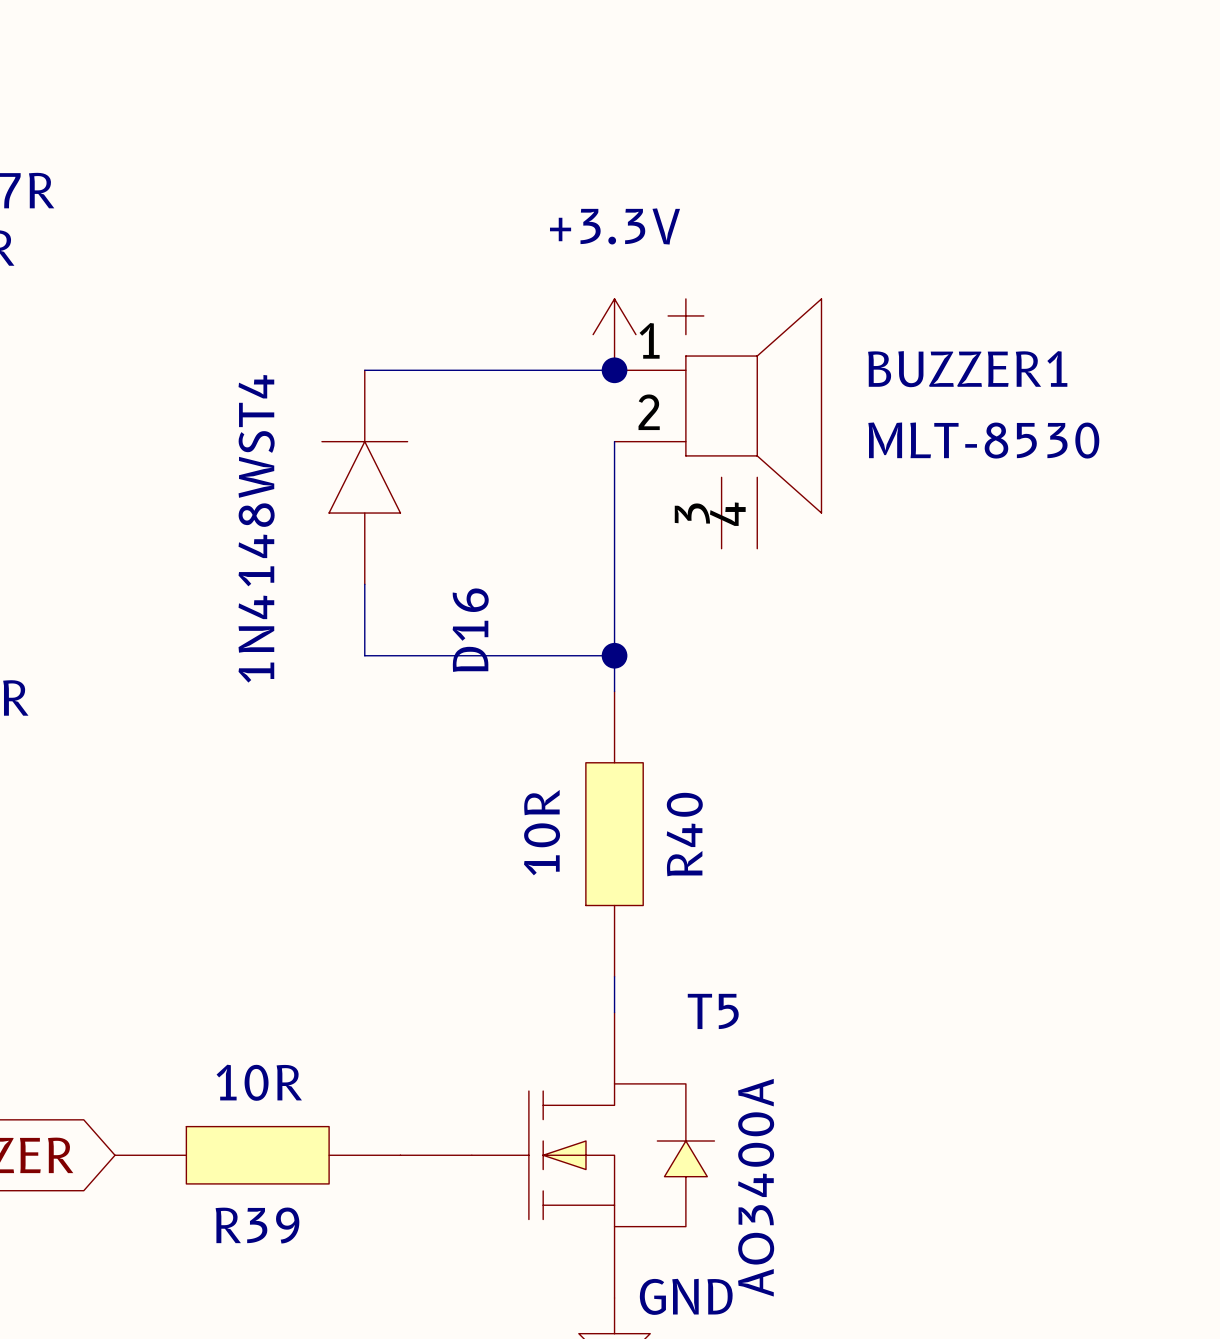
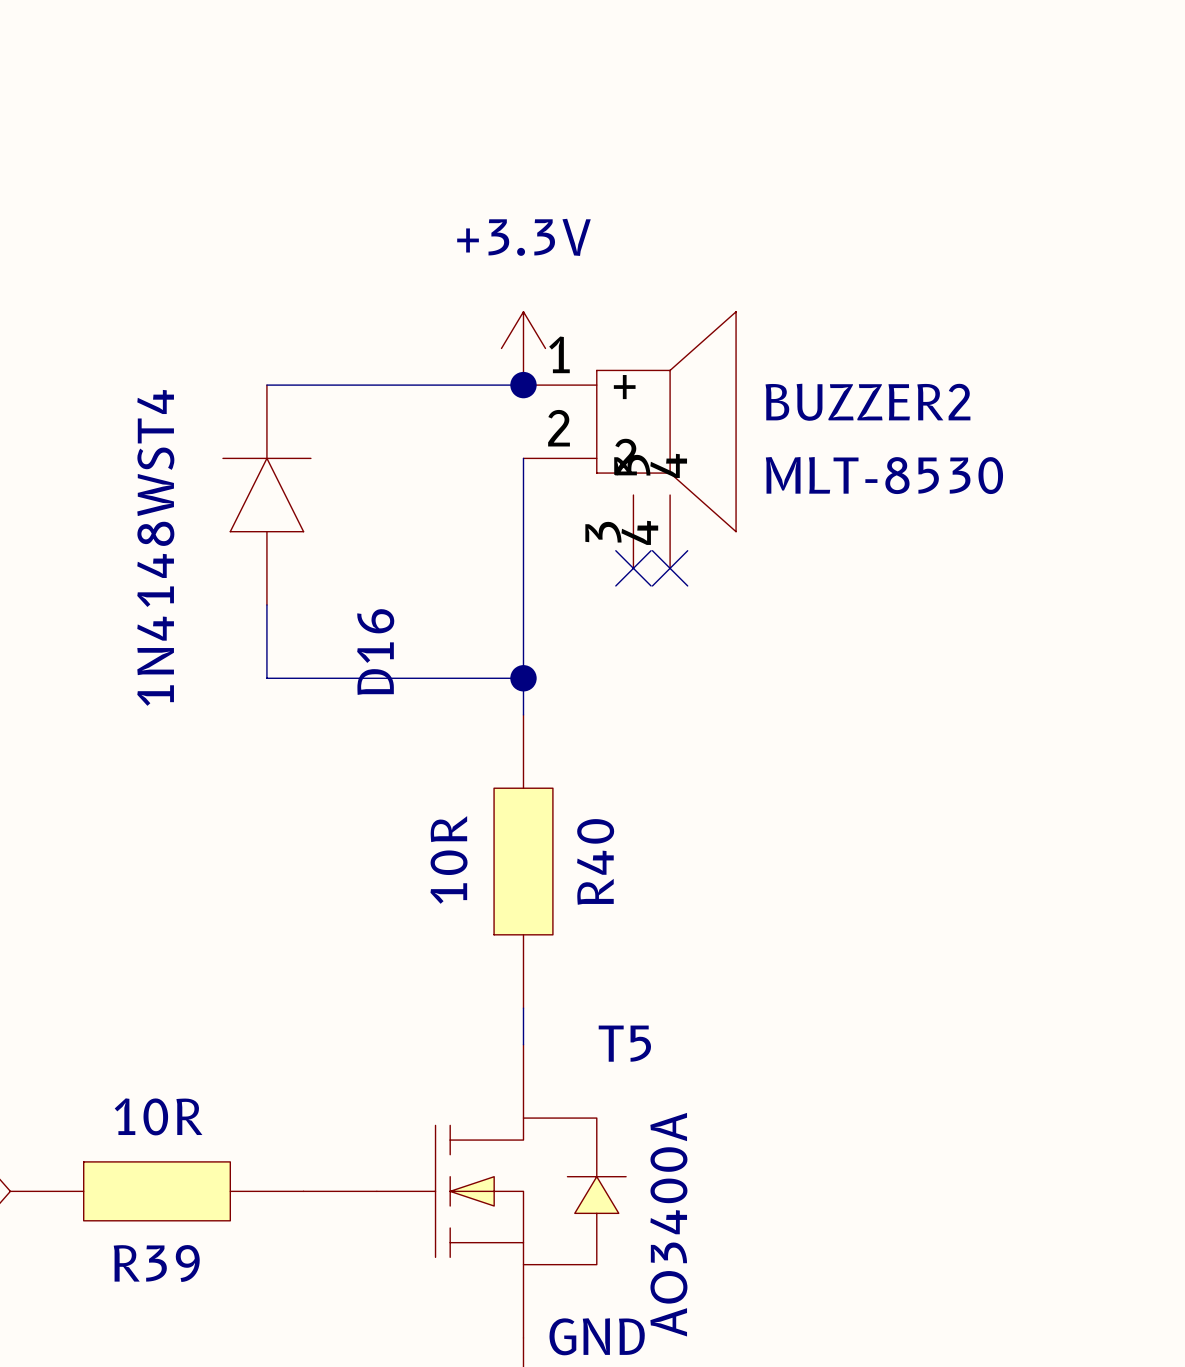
BUZZER1: MLT-8530 (718, 423) -> none
BUZZER2: none -> MLT-8530 (629, 440)
no-connect mark: none -> (633, 568)
no-connect mark: none -> (670, 568)

